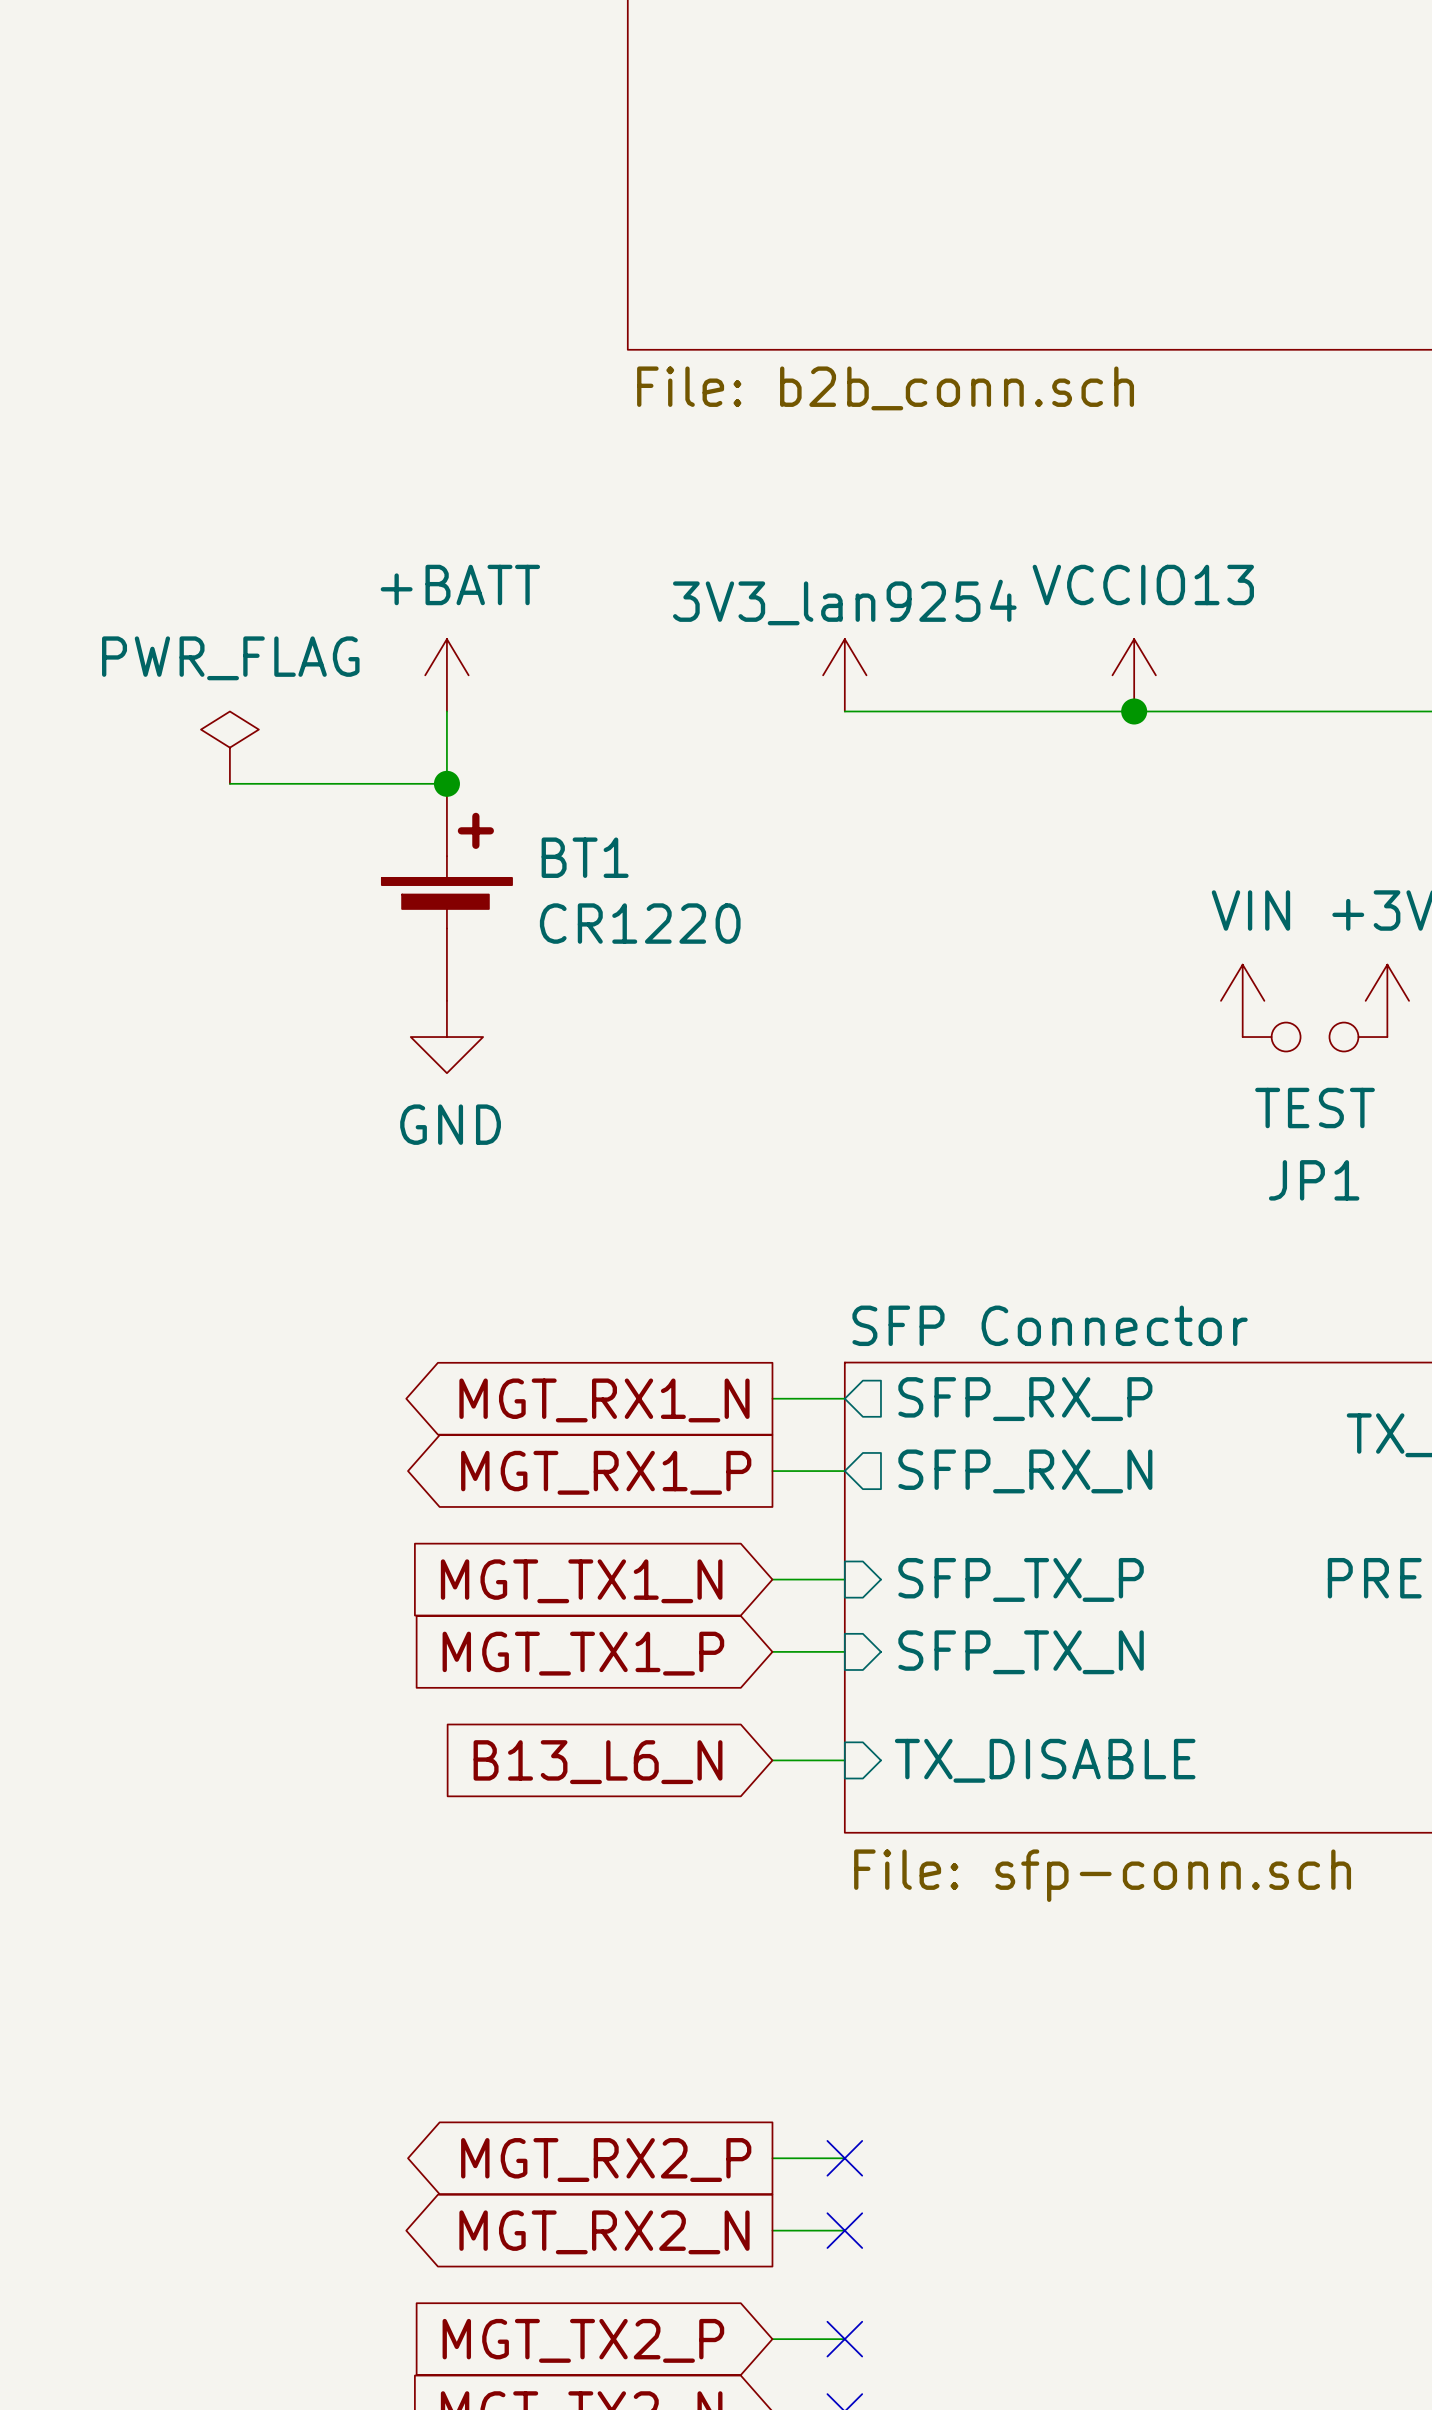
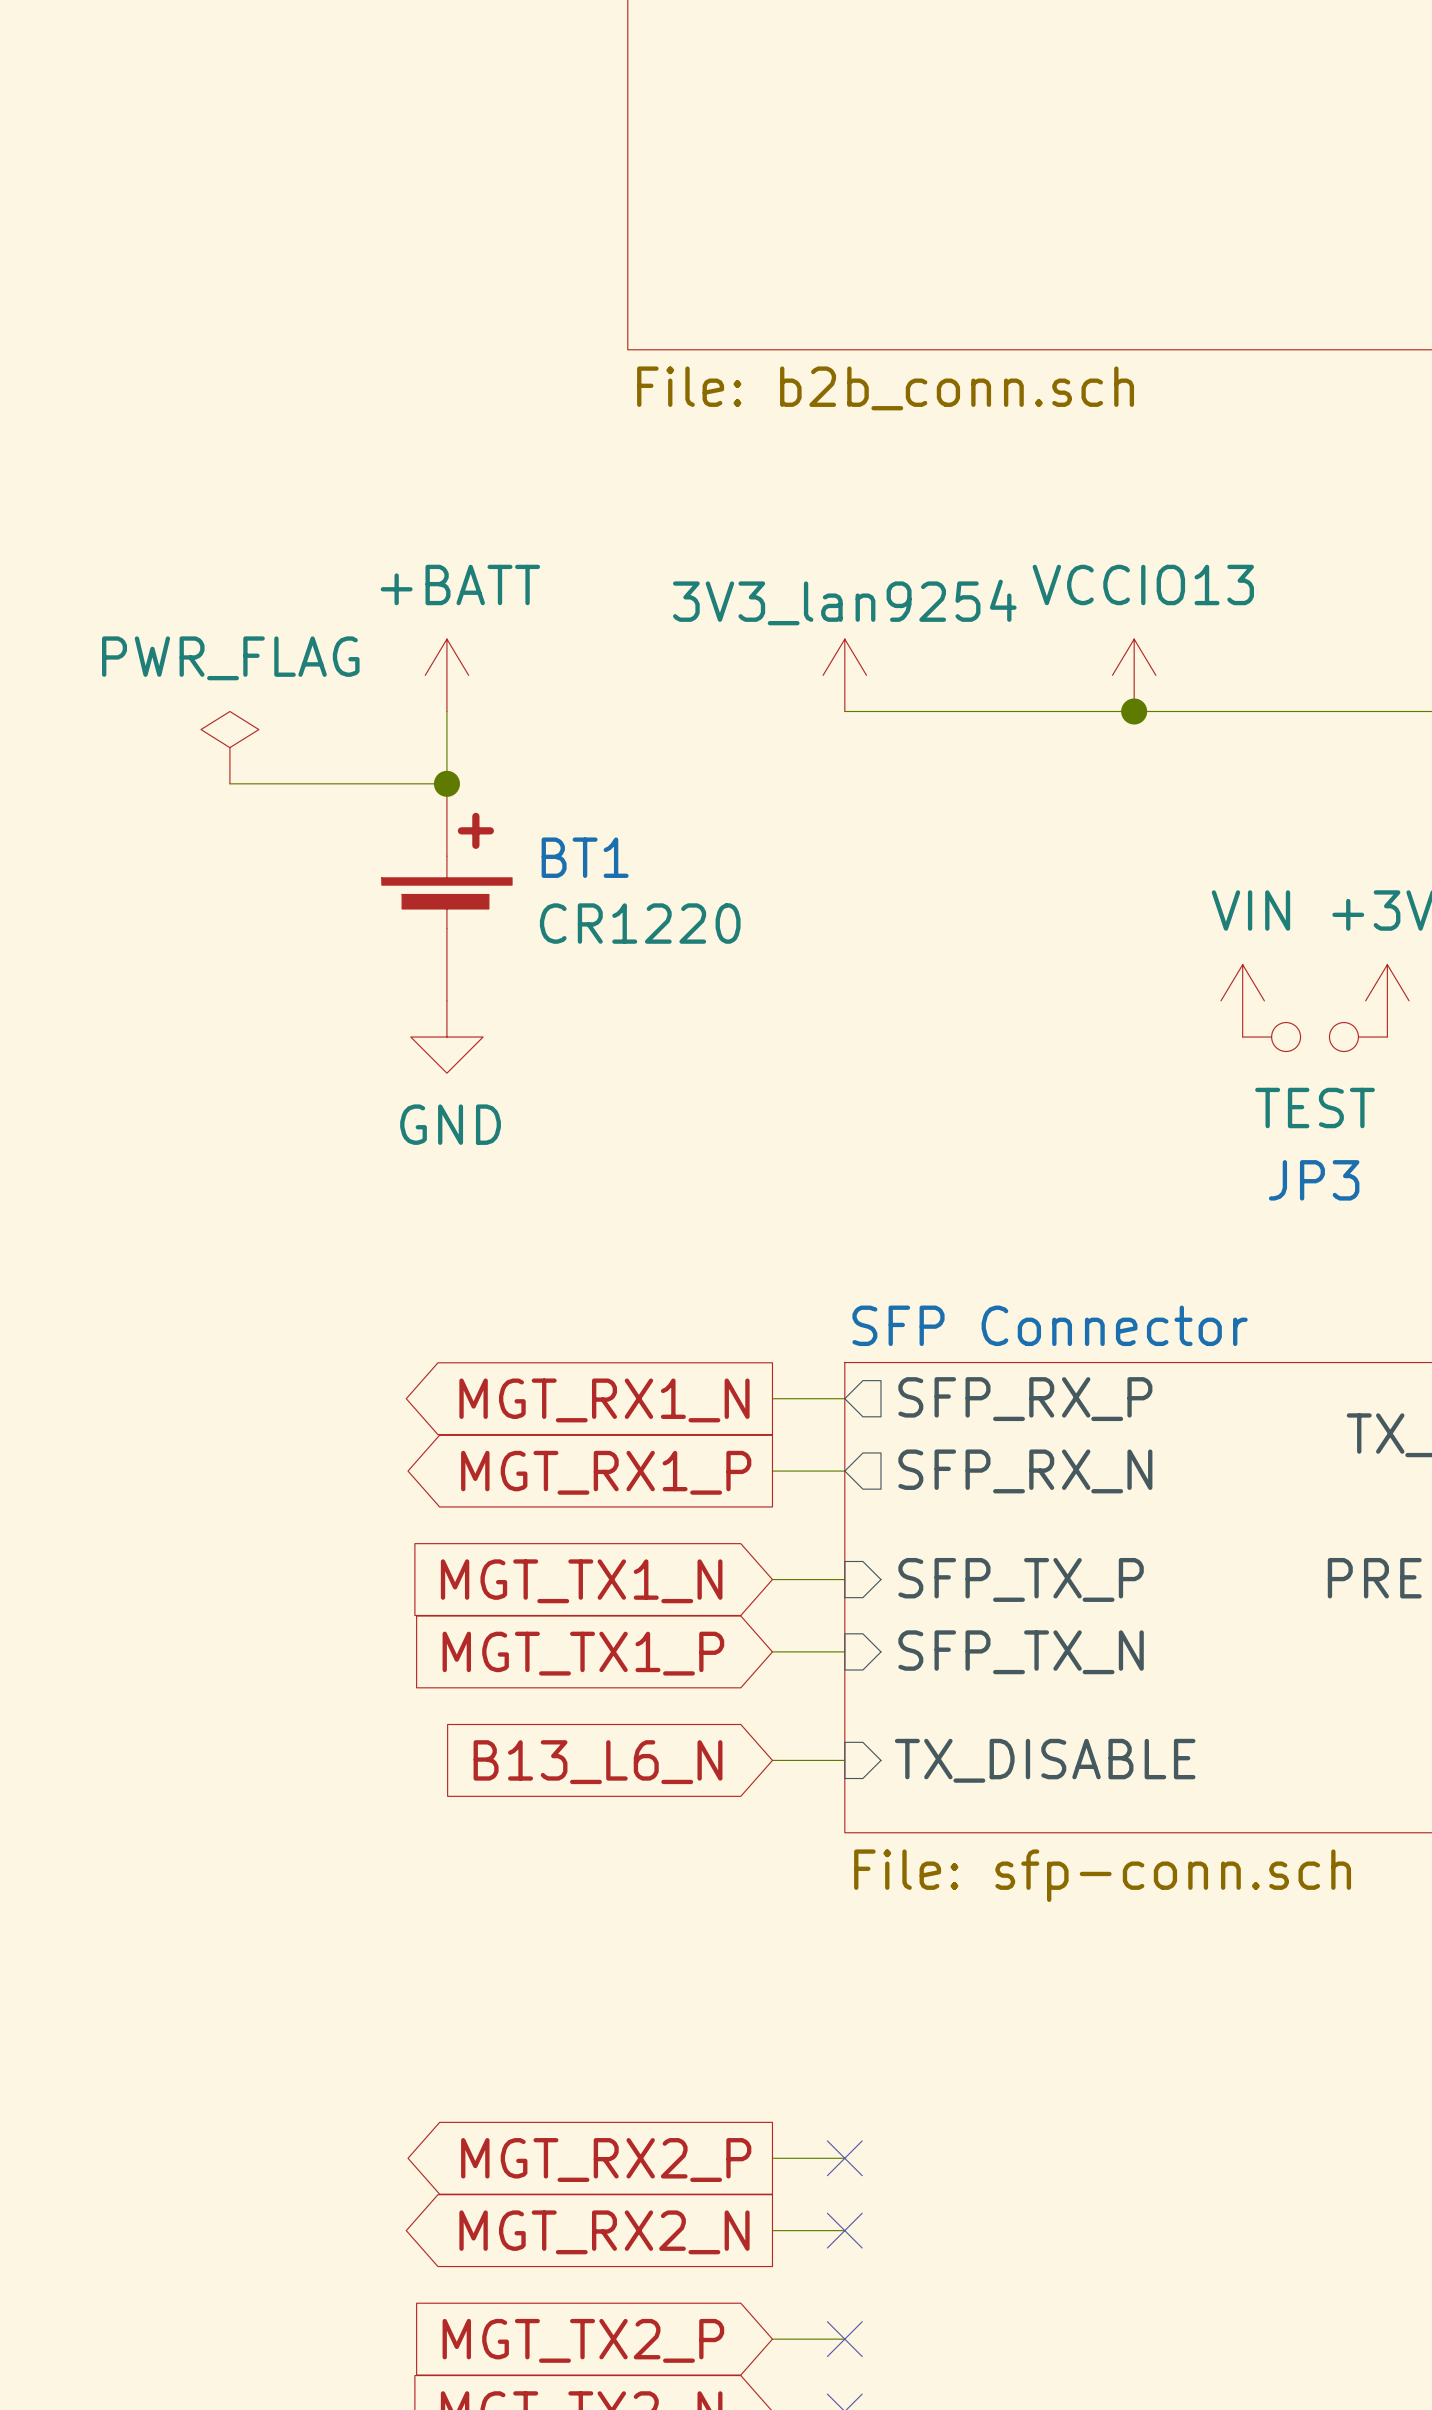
JP1 name: JP1 (1314, 1180) -> JP3 (1314, 1180)

